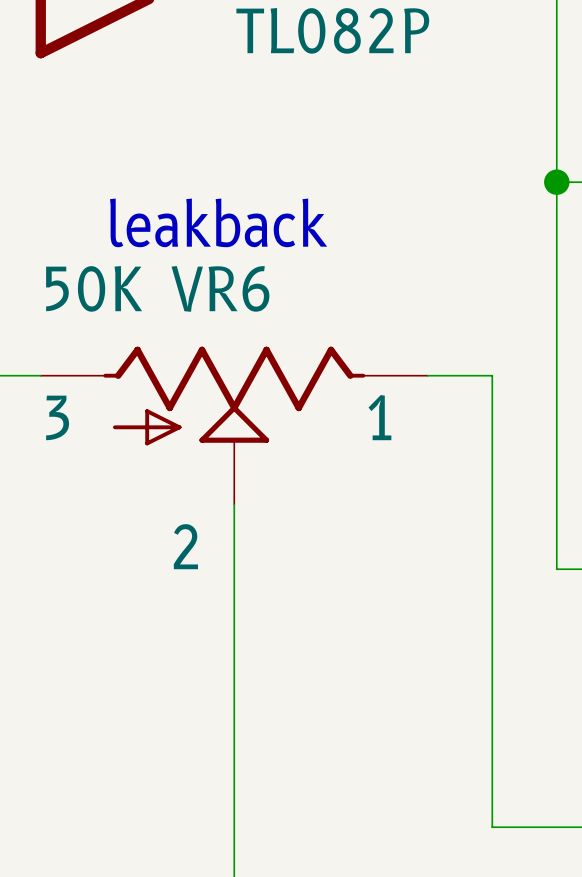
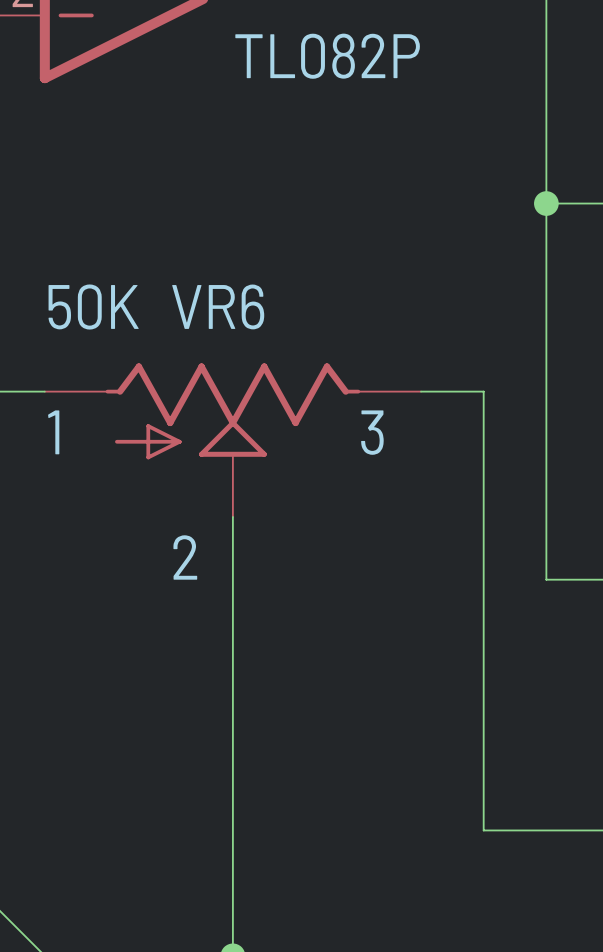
text: leakback (218, 222) -> none
text: 3 (57, 417) -> 1 (53, 432)
text: 1 (379, 417) -> 3 (372, 432)

